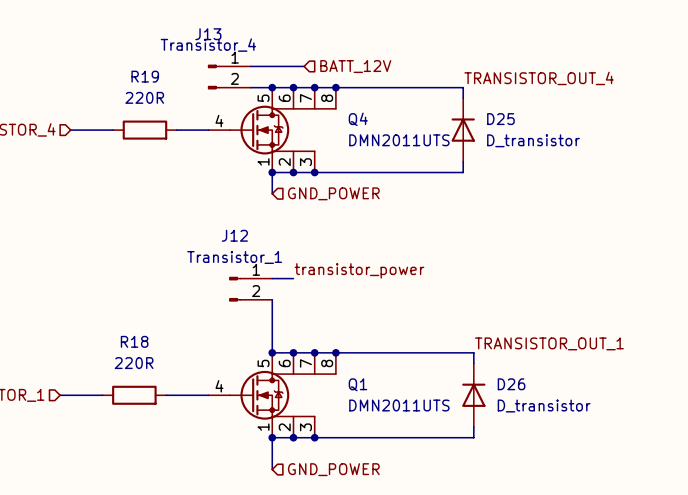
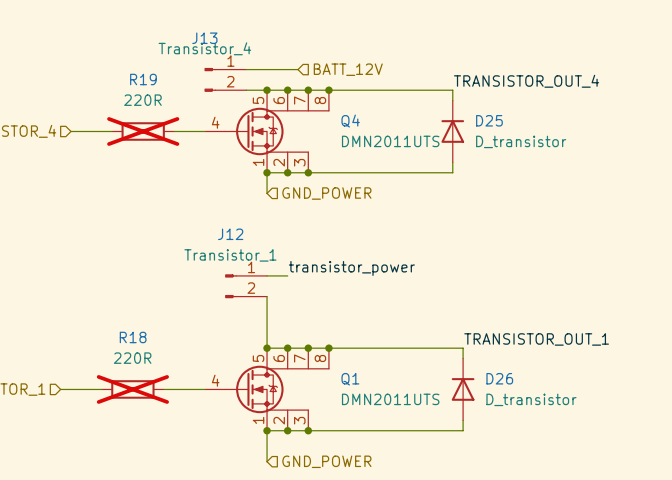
R19 do-not-place cross: none -> (143, 131)
R18 do-not-place cross: none -> (132, 389)

